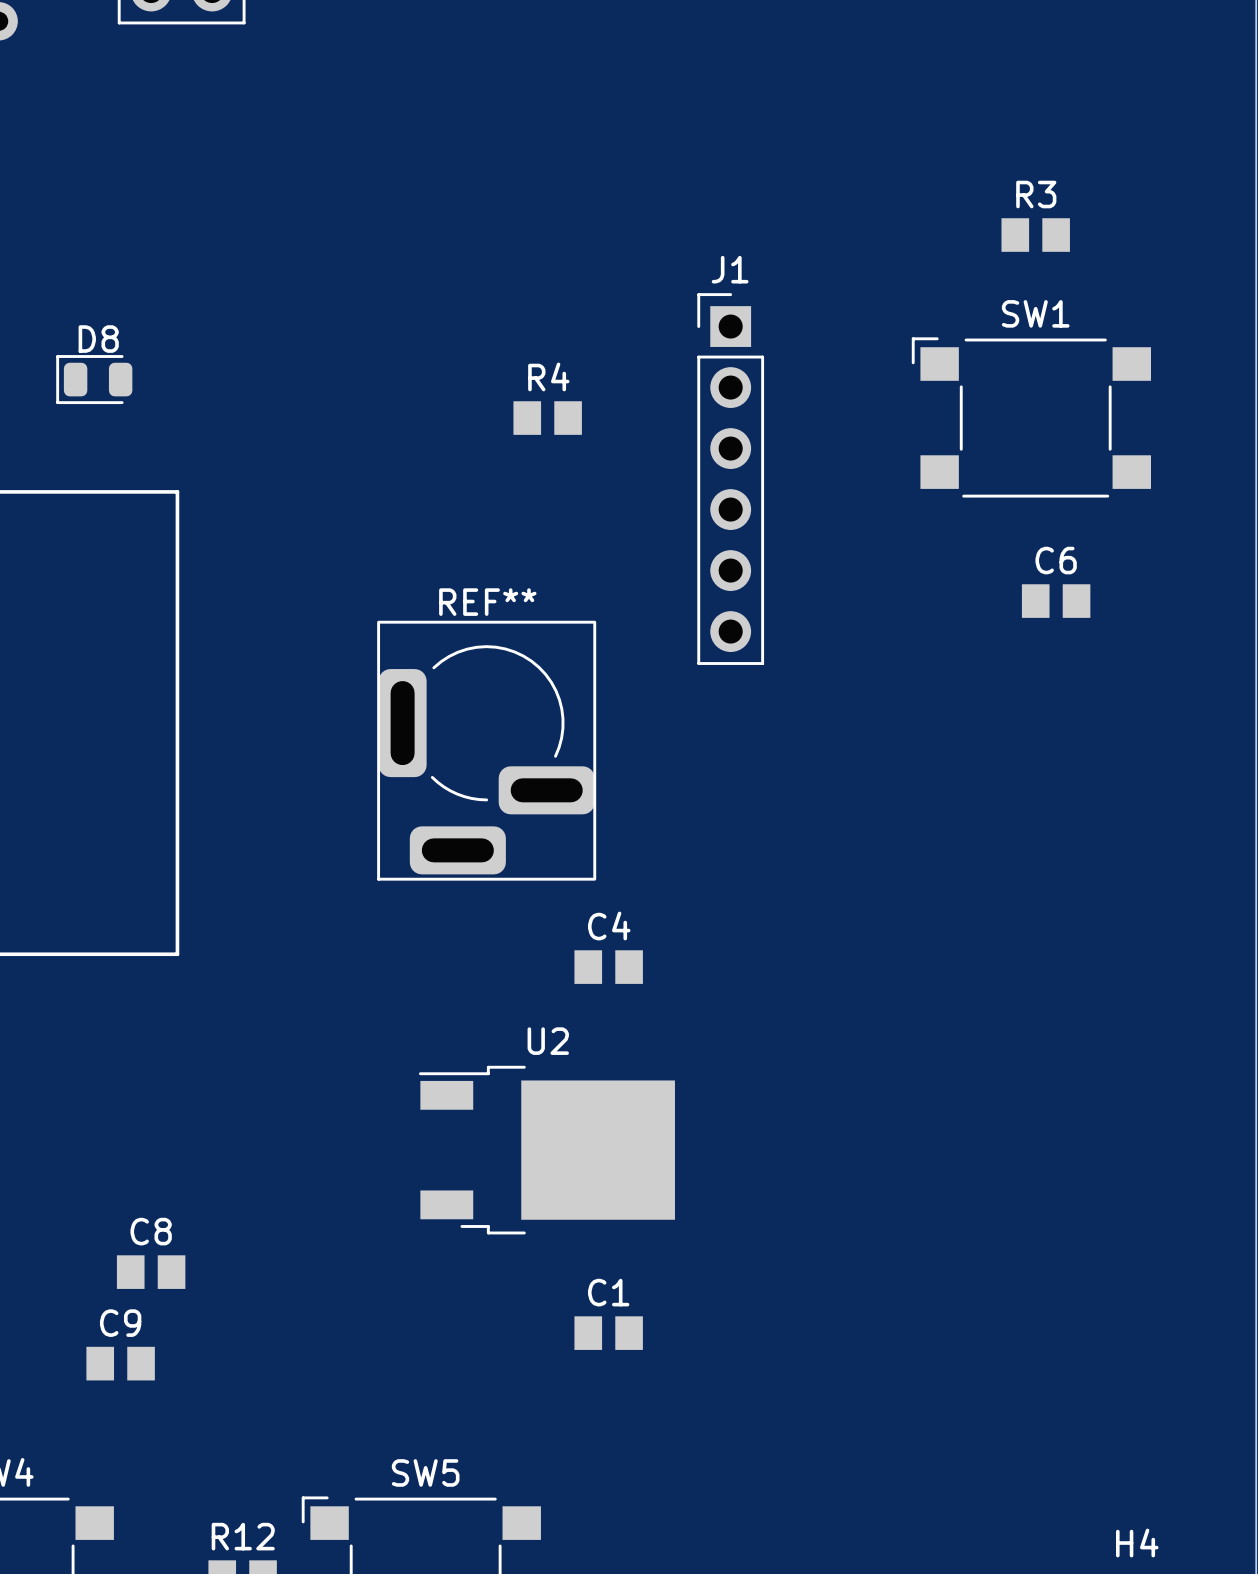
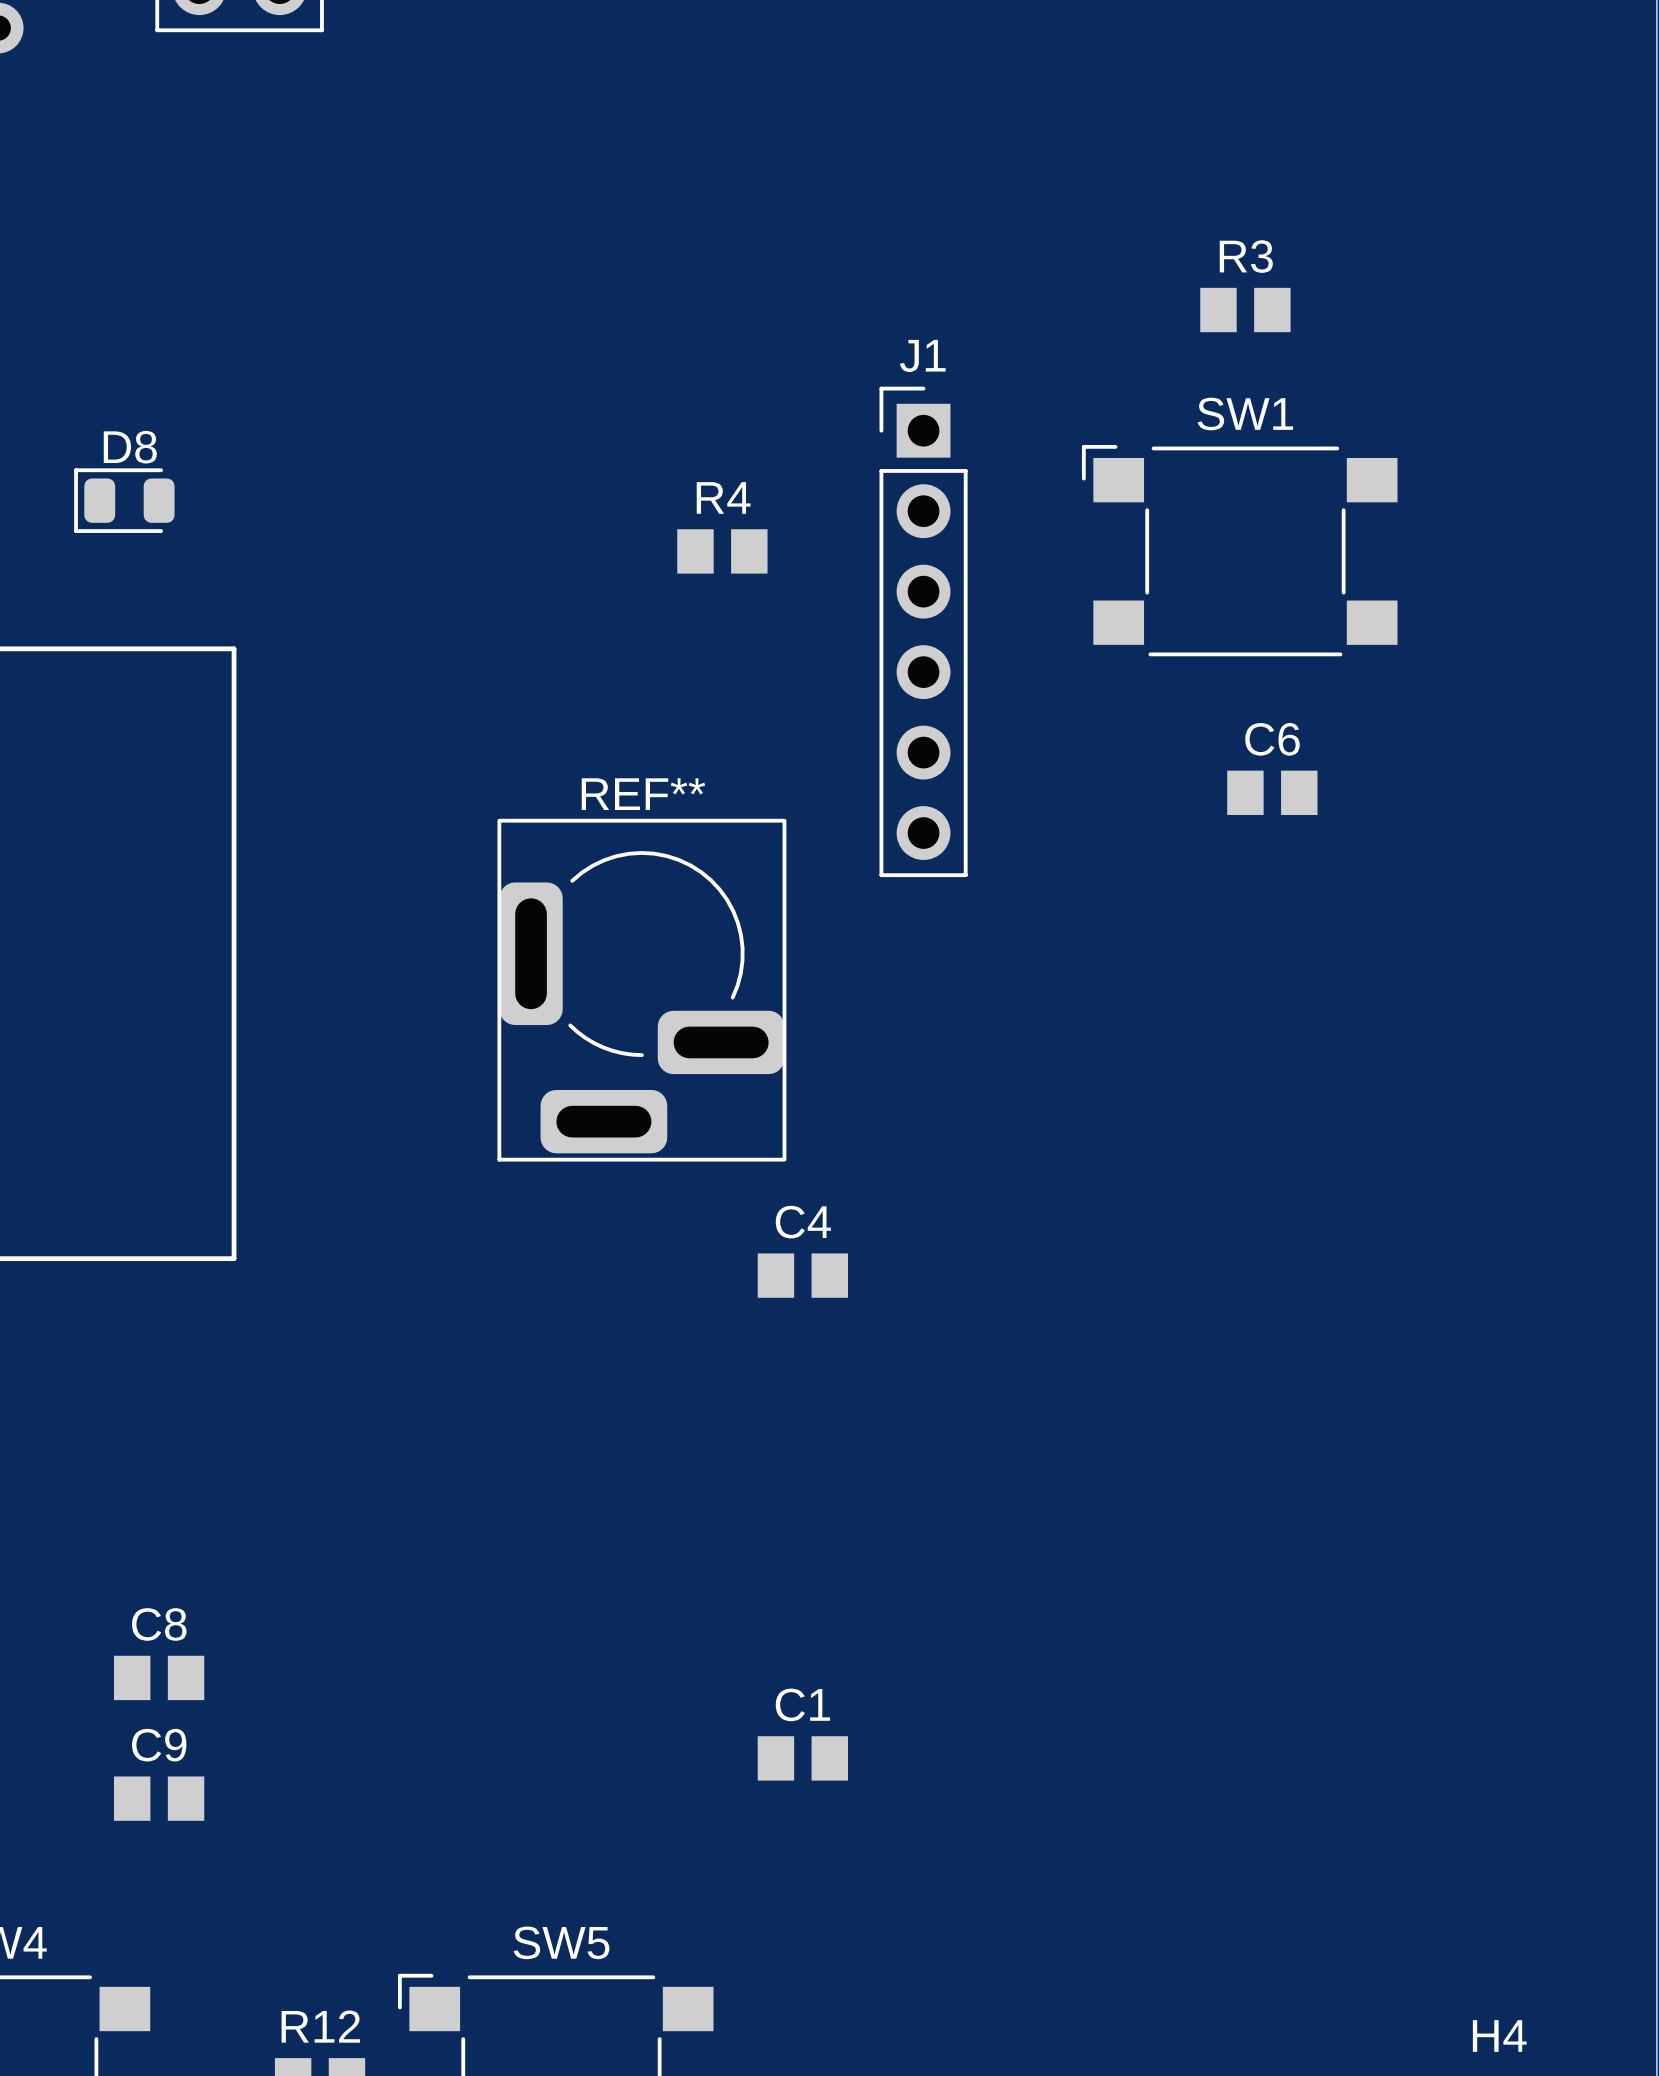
R3 position: (1035, 235) -> (1245, 310)
SW1 position: (1031, 417) -> (1239, 550)
J1 position: (730, 479) -> (923, 631)
C6 position: (1056, 601) -> (1272, 792)
U2: (546, 1150) -> none
C8 position: (151, 1272) -> (159, 1677)

